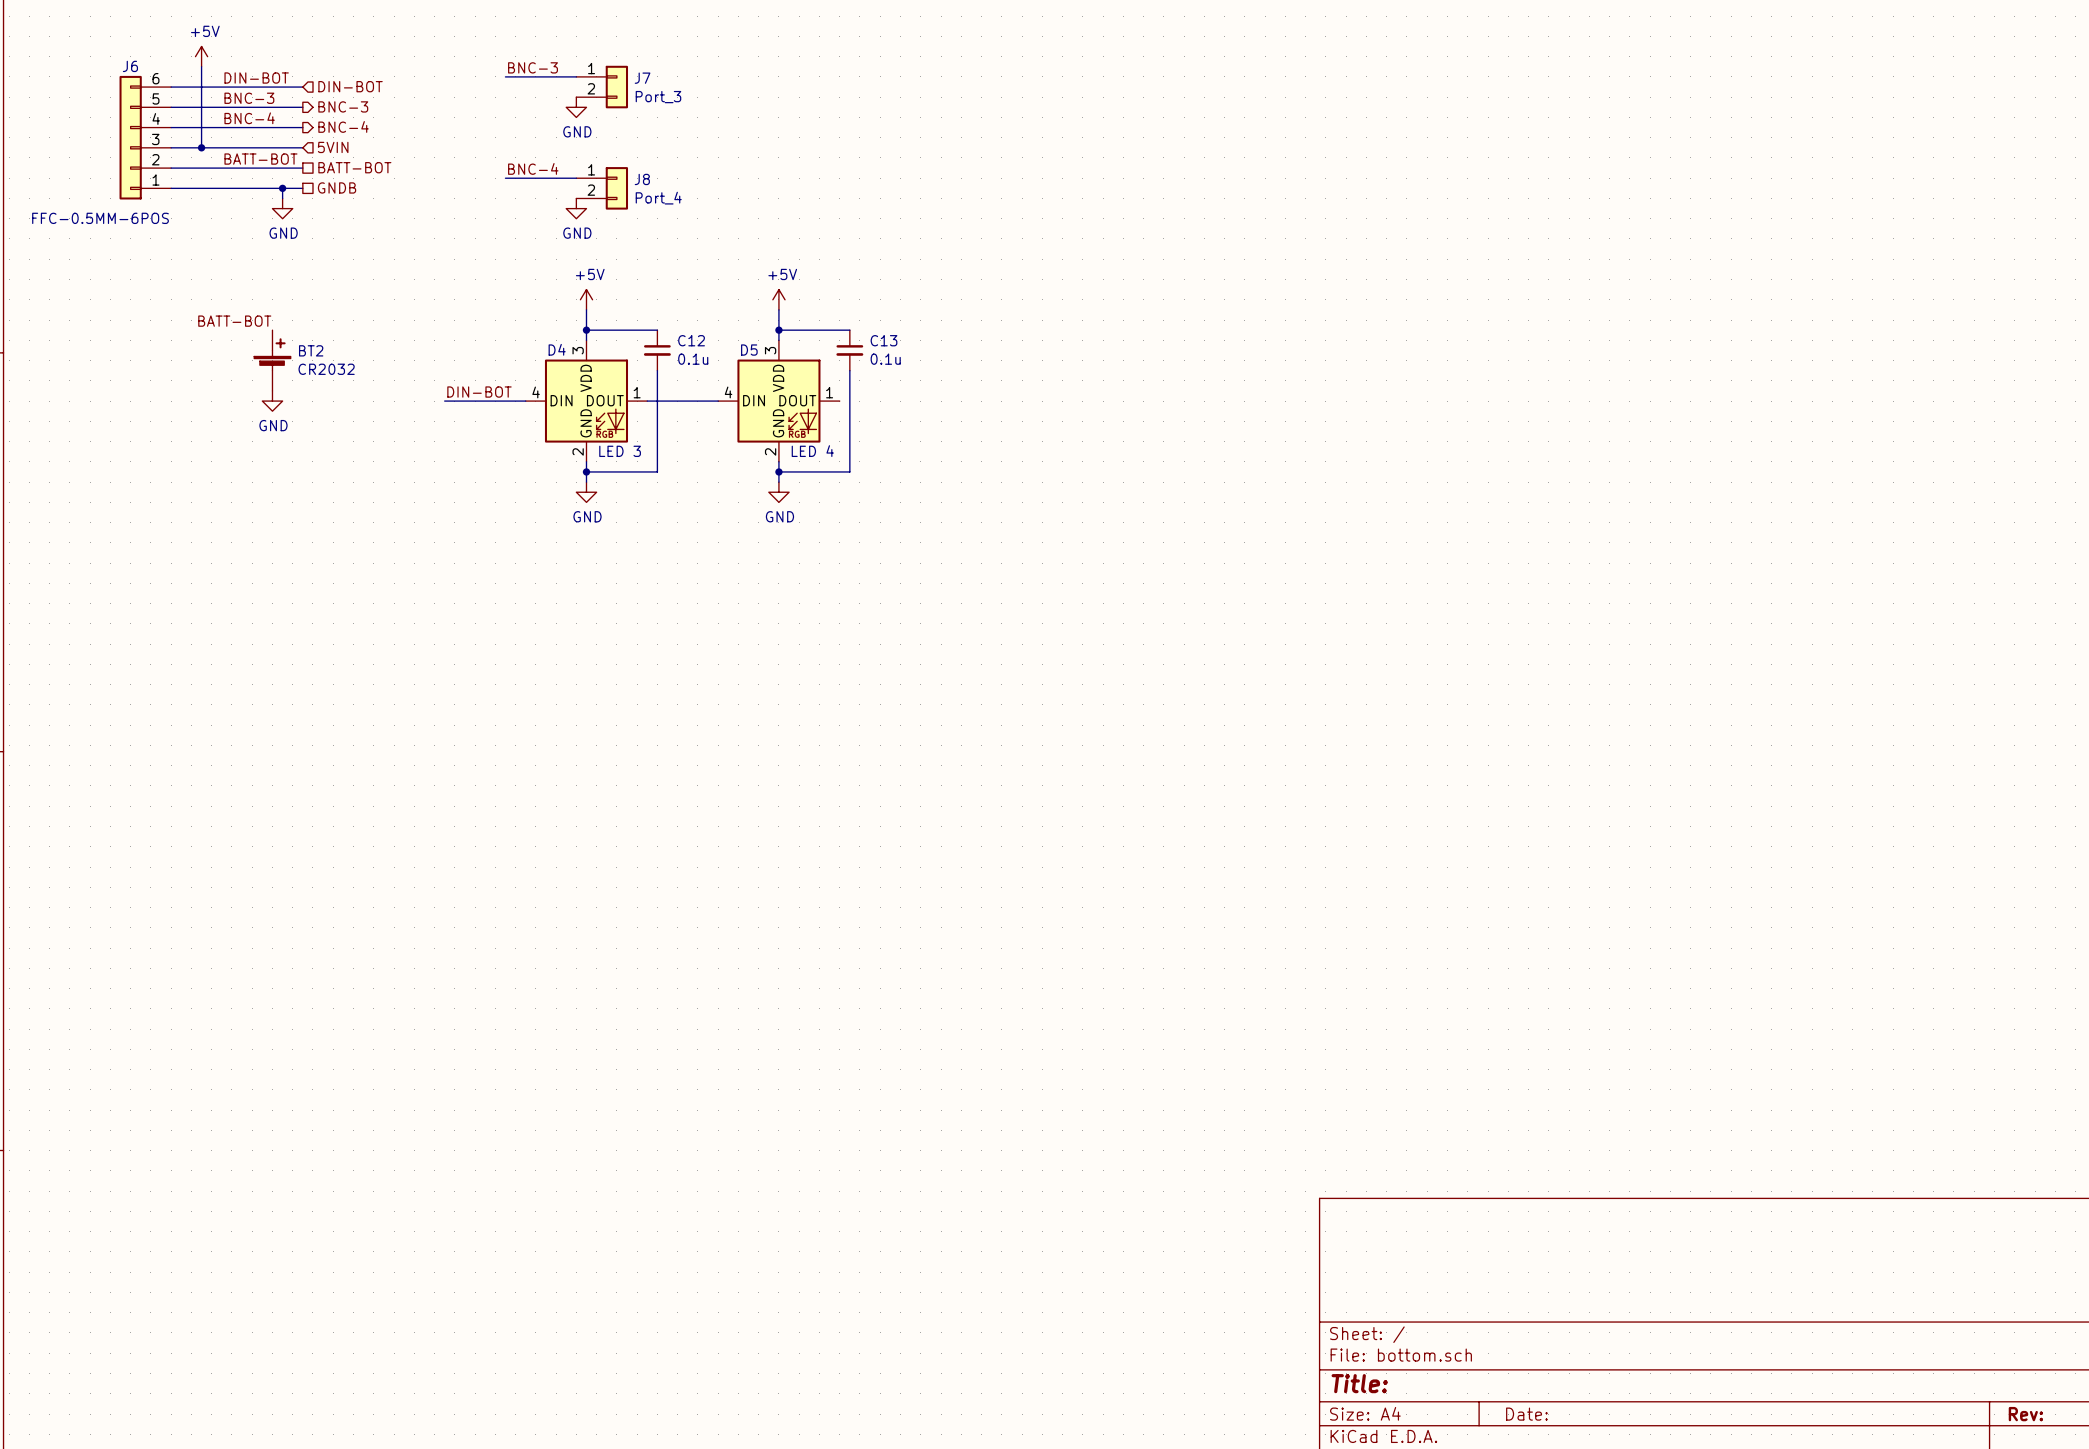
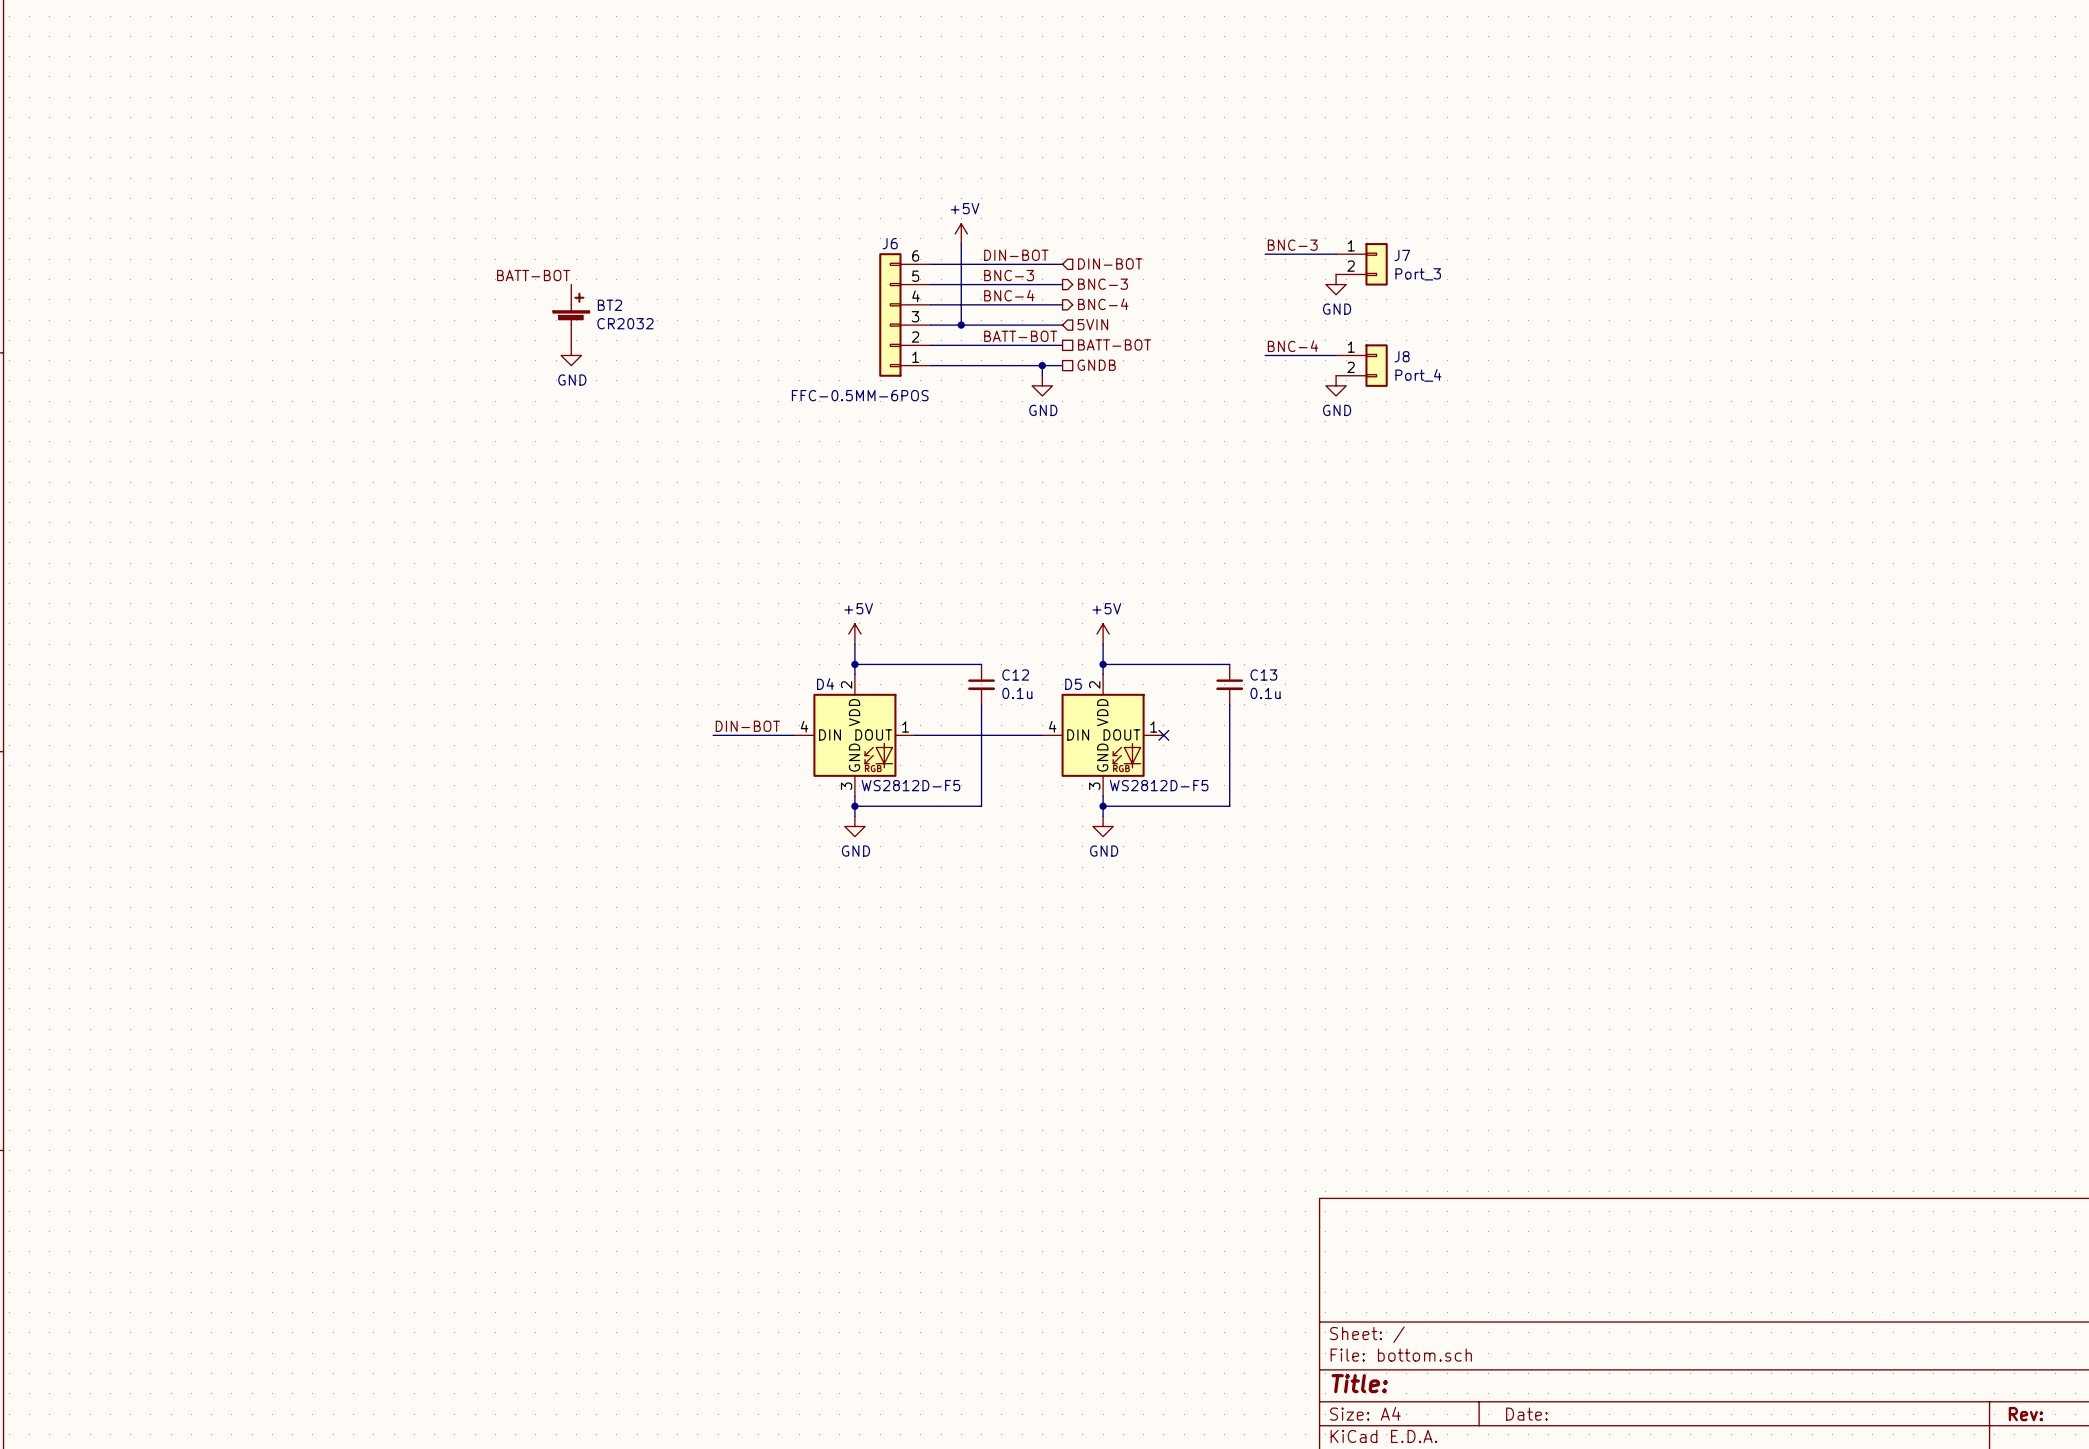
power symbol: +5V (201, 56) -> none
wire: (201, 66) (201, 147) -> none
label: BNC-3 (533, 67) -> none
wire: (505, 76) (576, 76) -> none
label: DIN-BOT (256, 78) -> none
hierarchical label: DIN-BOT (350, 86) -> none
wire: (171, 87) (302, 87) -> none
J7 position: (602, 87) -> (1361, 264)
label: BNC-3 (249, 98) -> none
hierarchical label: BNC-3 (343, 106) -> none
wire: (171, 107) (302, 107) -> none
power symbol: GND (576, 107) -> none
label: BNC-4 (249, 118) -> none
hierarchical label: BNC-4 (343, 126) -> none
wire: (171, 127) (302, 127) -> none
J6 position: (145, 137) -> (905, 314)
wire: (171, 147) (302, 147) -> none
junction: (201, 147) -> none
hierarchical label: 5VIN (333, 147) -> none
label: BATT-BOT (260, 159) -> none
hierarchical label: BATT-BOT (354, 167) -> none
wire: (171, 168) (302, 168) -> none
label: BNC-4 (533, 168) -> none
wire: (505, 178) (576, 178) -> none
hierarchical label: GNDB (337, 187) -> none
wire: (171, 188) (302, 188) -> none
wire: (282, 188) (282, 198) -> none
junction: (282, 188) -> none
J8 position: (602, 188) -> (1361, 365)
power symbol: GND (282, 208) -> none
power symbol: GND (576, 208) -> none
power symbol: none -> +5V (961, 233)
wire: none -> (961, 244) (961, 325)
label: none -> BNC-3 (1292, 245)
wire: none -> (1265, 254) (1336, 254)
label: none -> DIN-BOT (1016, 255)
hierarchical label: none -> DIN-BOT (1110, 263)
wire: none -> (930, 264) (1062, 264)
label: none -> BATT-BOT (533, 275)
label: none -> BNC-3 (1009, 275)
wire: none -> (930, 284) (1062, 284)
hierarchical label: none -> BNC-3 (1103, 284)
power symbol: none -> GND (1336, 284)
label: none -> BNC-4 (1009, 295)
power symbol: +5V (586, 299) -> none
power symbol: +5V (778, 299) -> none
wire: none -> (930, 304) (1062, 304)
hierarchical label: none -> BNC-4 (1103, 304)
wire: (586, 309) (586, 340) -> none
wire: (778, 309) (778, 340) -> none
label: BATT-BOT (234, 321) -> none
hierarchical label: none -> 5VIN (1092, 324)
wire: none -> (930, 325) (1062, 325)
junction: none -> (961, 325)
wire: (586, 330) (657, 330) -> none
junction: (586, 330) -> none
wire: (778, 330) (849, 330) -> none
junction: (778, 330) -> none
label: none -> BATT-BOT (1020, 336)
hierarchical label: none -> BATT-BOT (1114, 344)
wire: none -> (930, 345) (1062, 345)
label: none -> BNC-4 (1292, 346)
D4 pin number: 3 (578, 350) -> 2 (846, 684)
C12 position: (657, 350) -> (981, 684)
D5 pin number: 3 (770, 350) -> 2 (1094, 684)
C13 position: (849, 350) -> (1229, 684)
power symbol: none -> GND (571, 355)
wire: none -> (1265, 355) (1336, 355)
BT2 position: (272, 360) -> (571, 314)
wire: none -> (930, 365) (1062, 365)
wire: none -> (1042, 365) (1042, 375)
junction: none -> (1042, 365)
hierarchical label: none -> GNDB (1096, 365)
wire: (657, 370) (657, 471) (586, 471) -> none
wire: (849, 370) (849, 471) (778, 471) -> none
power symbol: none -> GND (1042, 385)
power symbol: none -> GND (1336, 385)
label: DIN-BOT (479, 392) -> none
power symbol: GND (272, 401) -> none
wire: (444, 401) (525, 401) -> none
D4 position: (586, 401) -> (854, 735)
wire: (647, 401) (718, 401) -> none
D5 position: (778, 401) -> (1103, 735)
D4 pin number: 2 (578, 451) -> 3 (846, 786)
D4 value: LED 3 (620, 451) -> WS2812D-F5 (910, 785)
D5 pin number: 2 (770, 451) -> 3 (1094, 786)
D5 value: LED 4 (812, 451) -> WS2812D-F5 (1159, 785)
wire: (586, 461) (586, 482) -> none
wire: (778, 461) (778, 482) -> none
junction: (586, 471) -> none
junction: (778, 471) -> none
power symbol: GND (586, 492) -> none
power symbol: GND (778, 492) -> none
power symbol: none -> +5V (854, 634)
power symbol: none -> +5V (1103, 634)
wire: none -> (854, 644) (854, 674)
wire: none -> (1103, 644) (1103, 674)
wire: none -> (854, 664) (981, 664)
junction: none -> (854, 664)
wire: none -> (1103, 664) (1229, 664)
junction: none -> (1103, 664)
wire: none -> (981, 704) (981, 806) (854, 806)
wire: none -> (1229, 704) (1229, 806) (1103, 806)
label: none -> DIN-BOT (747, 726)
wire: none -> (713, 735) (794, 735)
wire: none -> (915, 735) (1042, 735)
no-connect mark: none -> (1163, 735)
wire: none -> (854, 796) (854, 806)
wire: none -> (1103, 796) (1103, 816)
wire: none -> (854, 806) (854, 816)
junction: none -> (854, 806)
junction: none -> (1103, 806)
power symbol: none -> GND (854, 826)
power symbol: none -> GND (1103, 826)

